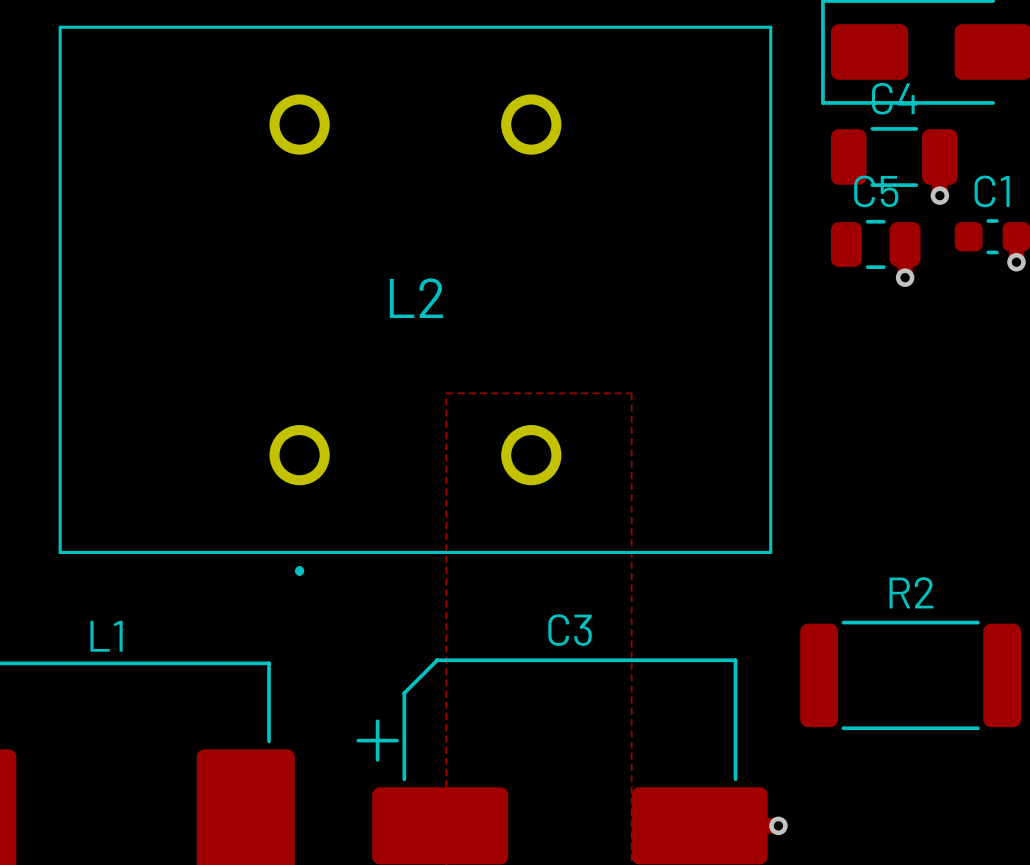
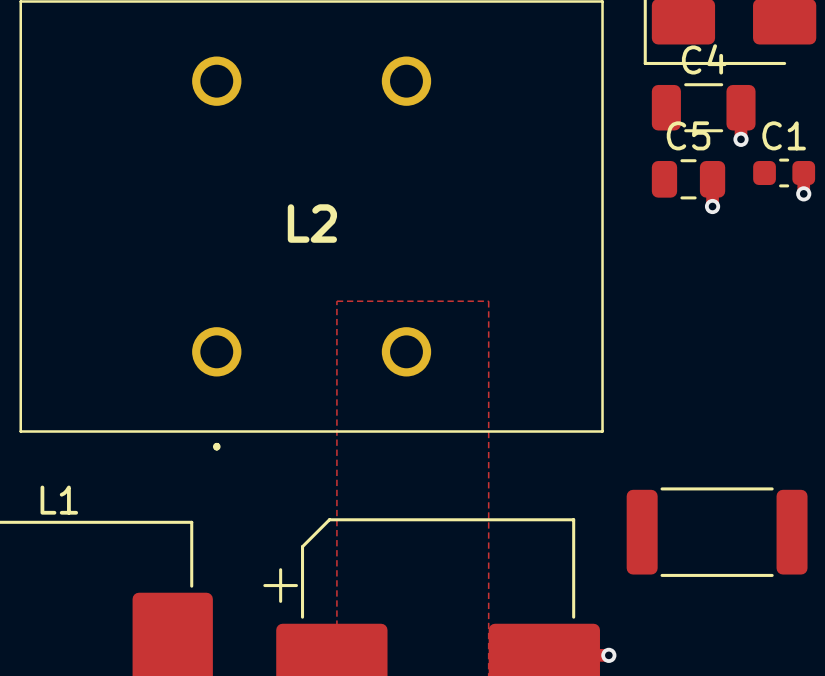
R2 name: R2 (911, 592) -> none
C3 name: C3 (570, 630) -> none

